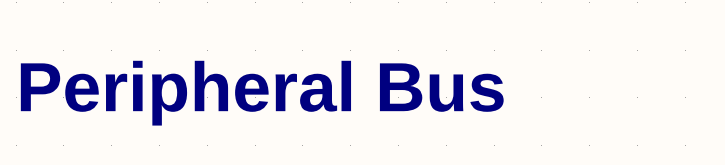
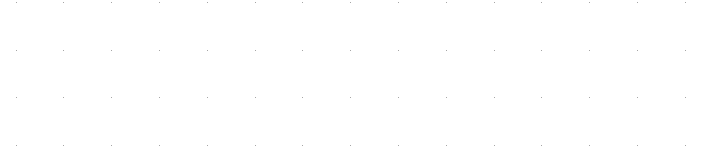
text: Peripheral Bus (262, 93) -> none

